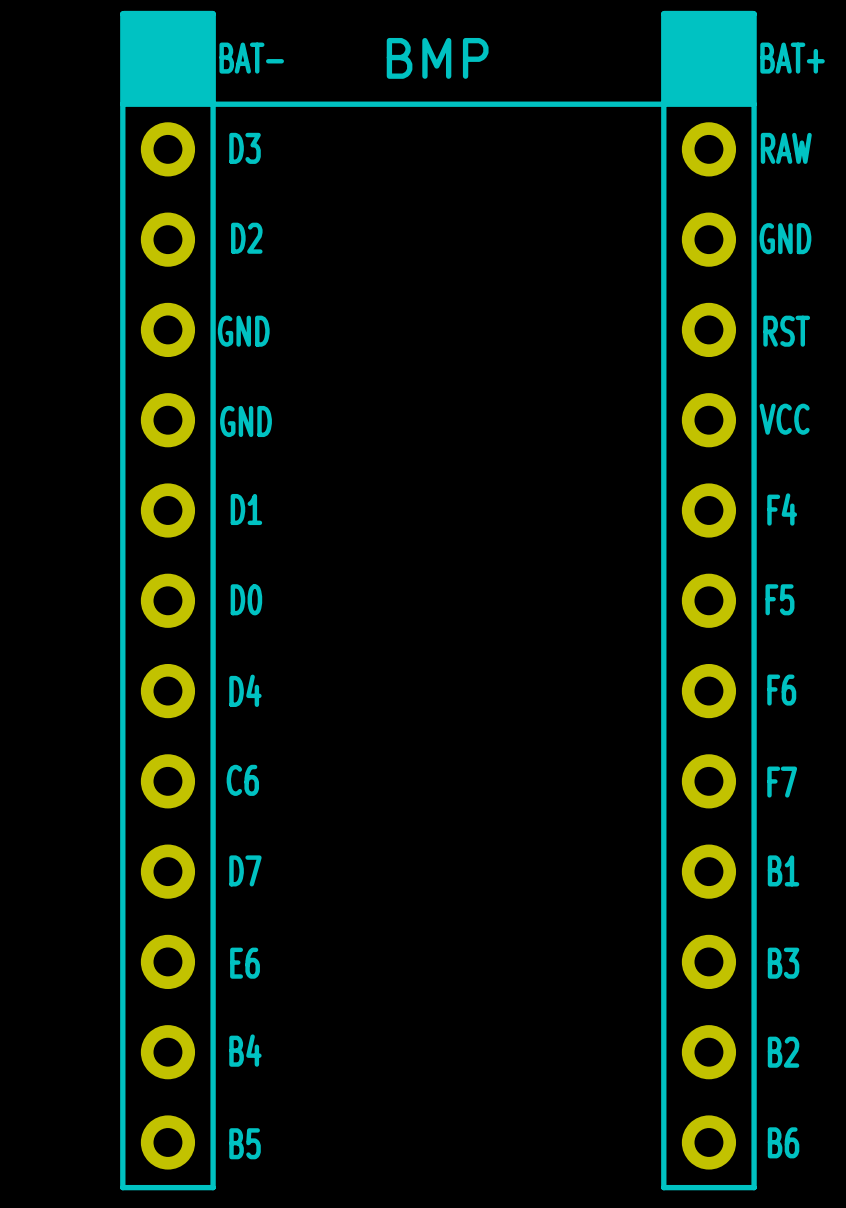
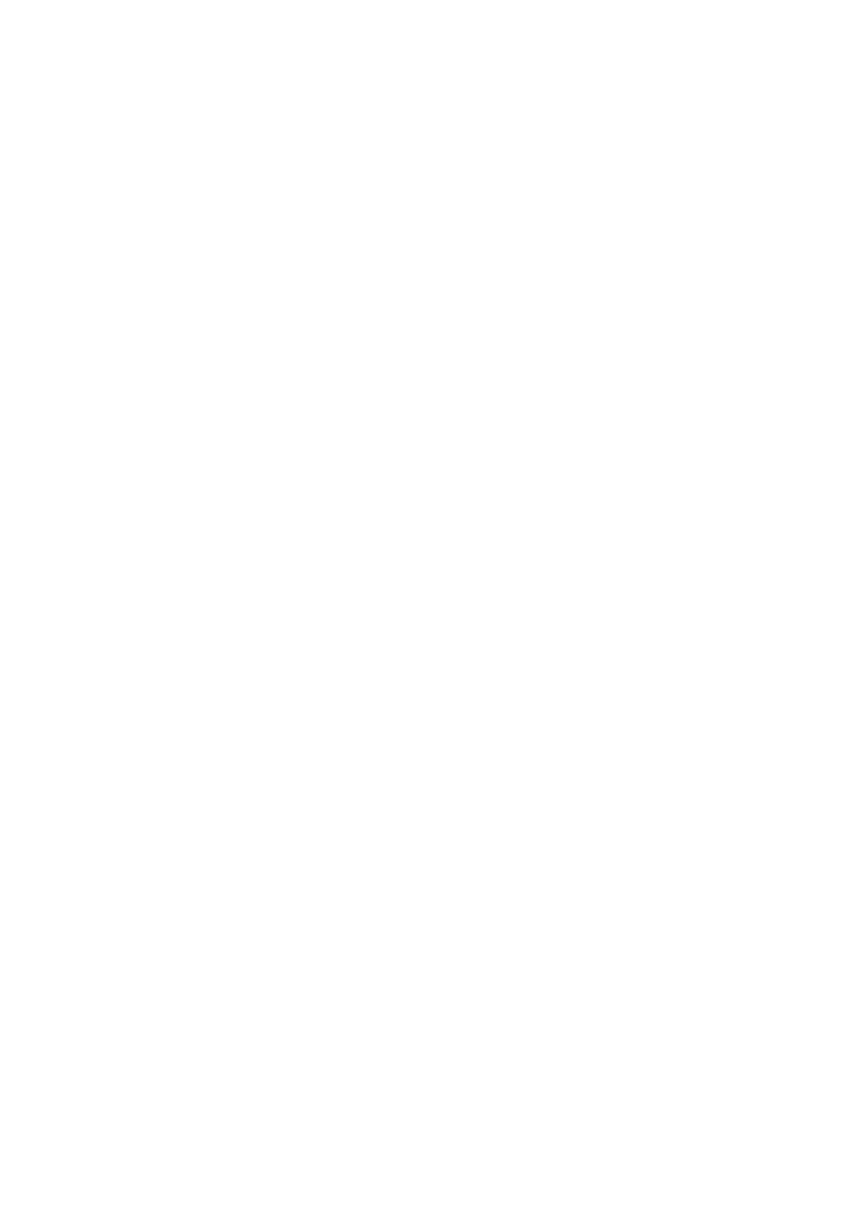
part: (438, 600) -> none

